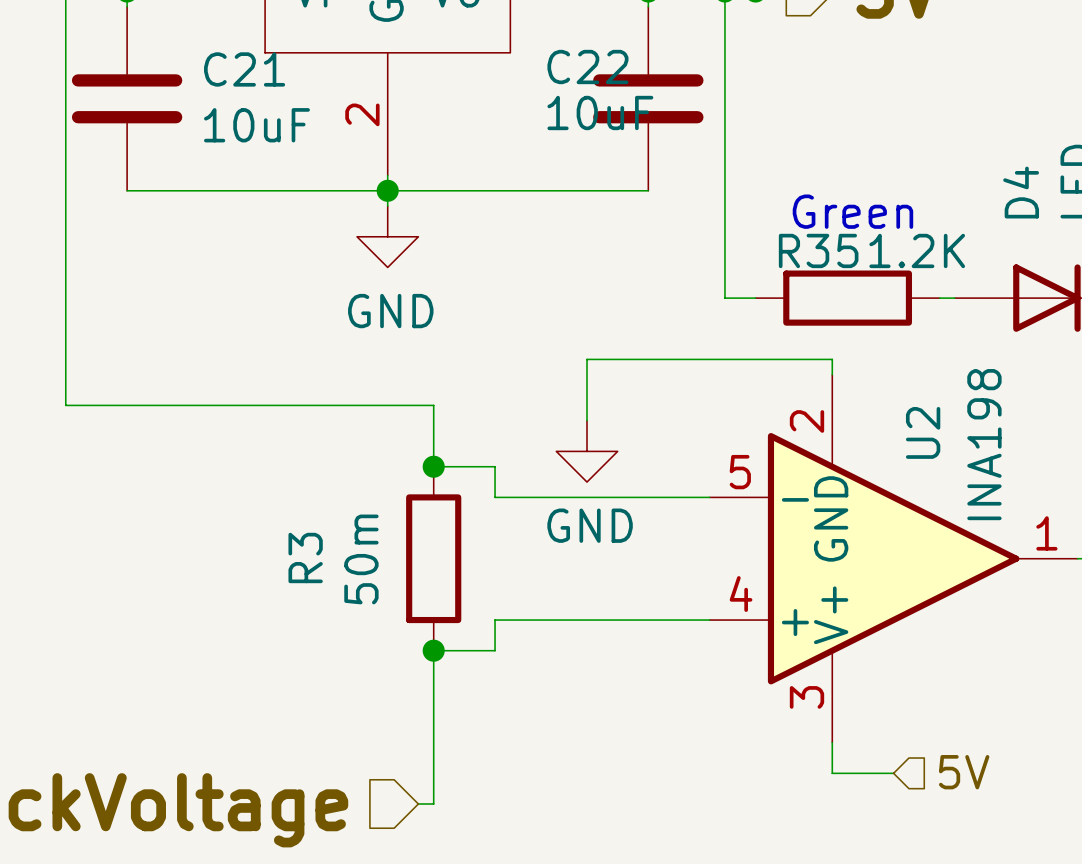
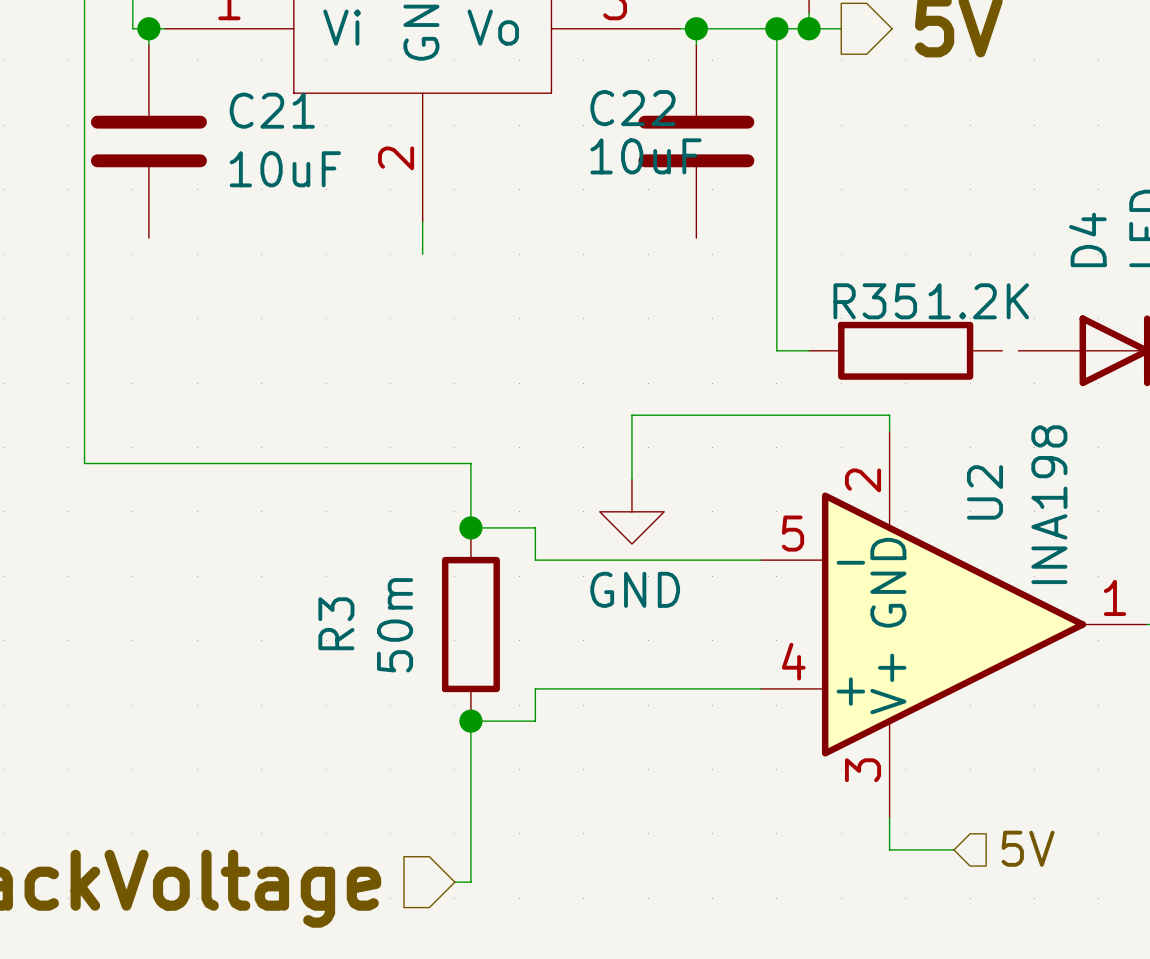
wire: (127, 190) (648, 190) -> none
junction: (387, 190) -> none
text: Green (852, 211) -> none
power symbol: GND (387, 236) -> none
wire: (939, 298) (954, 298) -> none

